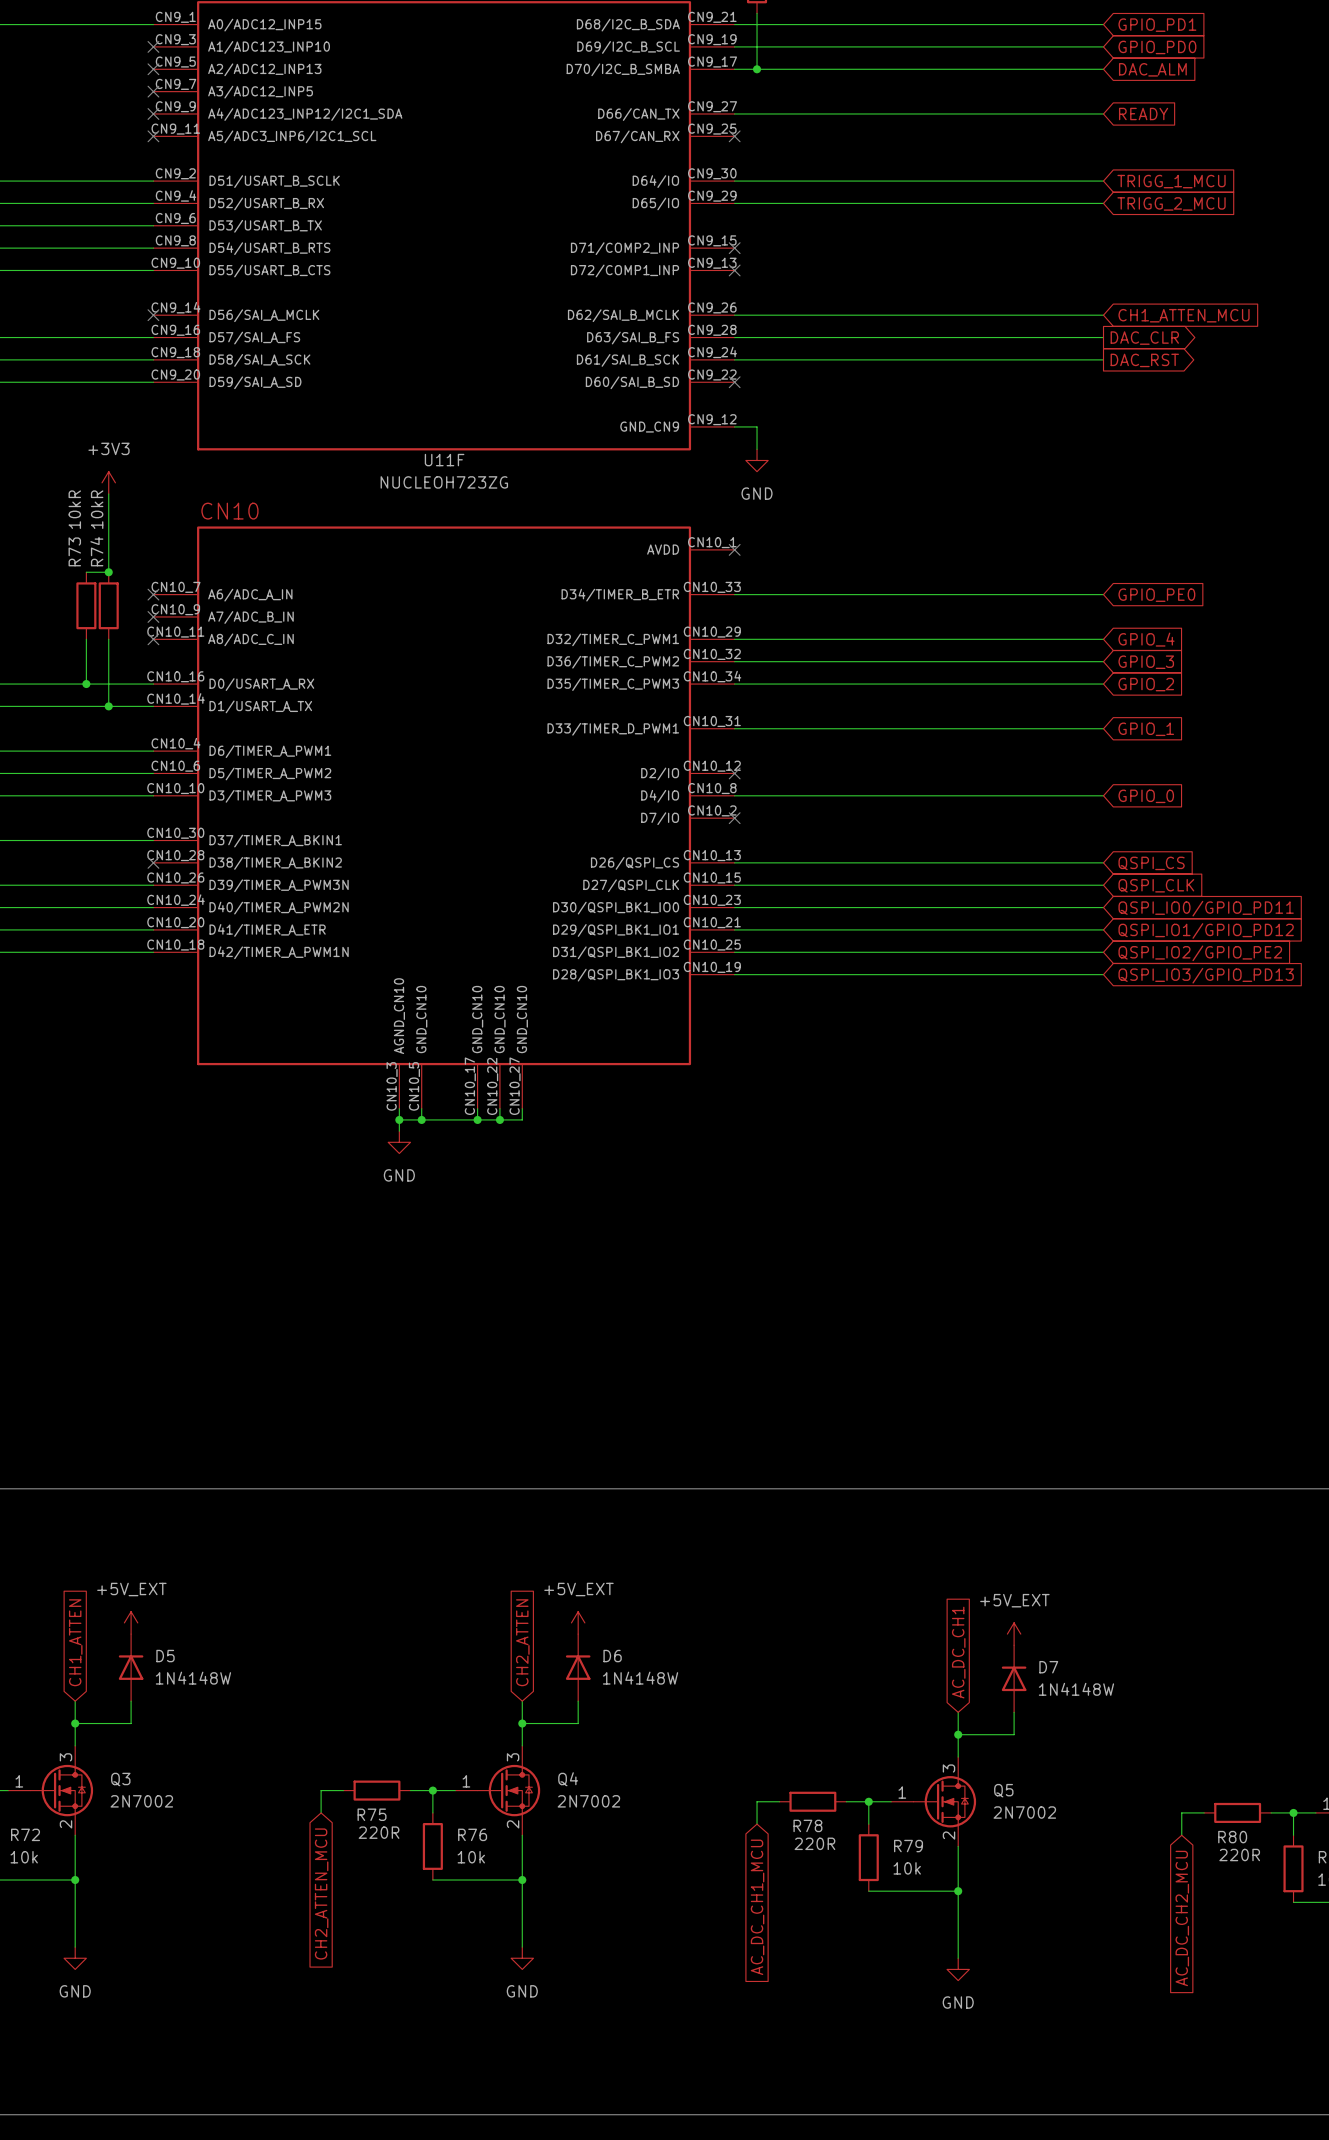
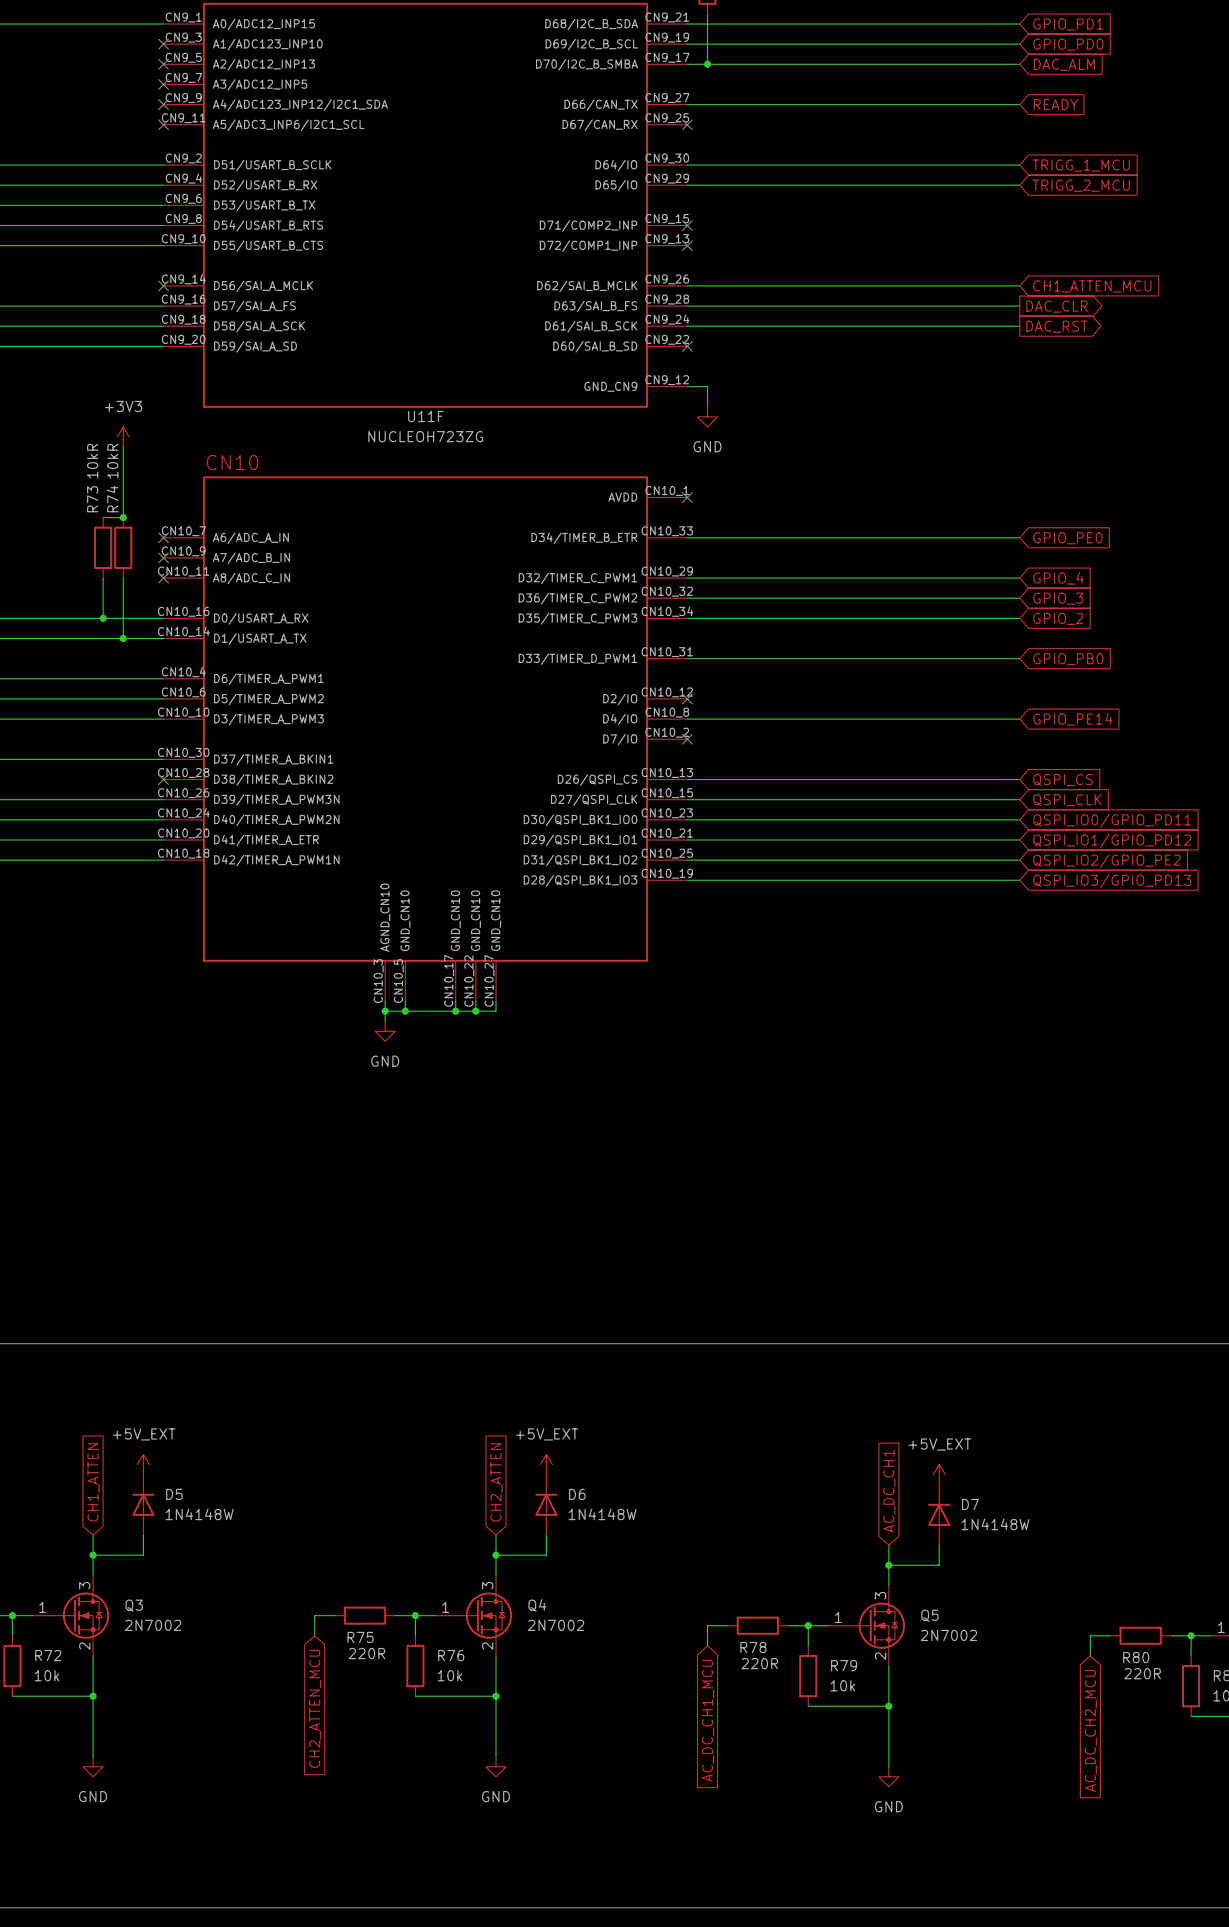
global label: GPIO_1 (1146, 729) -> GPIO_PB0 (1068, 659)
global label: GPIO_0 (1146, 796) -> GPIO_PE14 (1072, 719)

